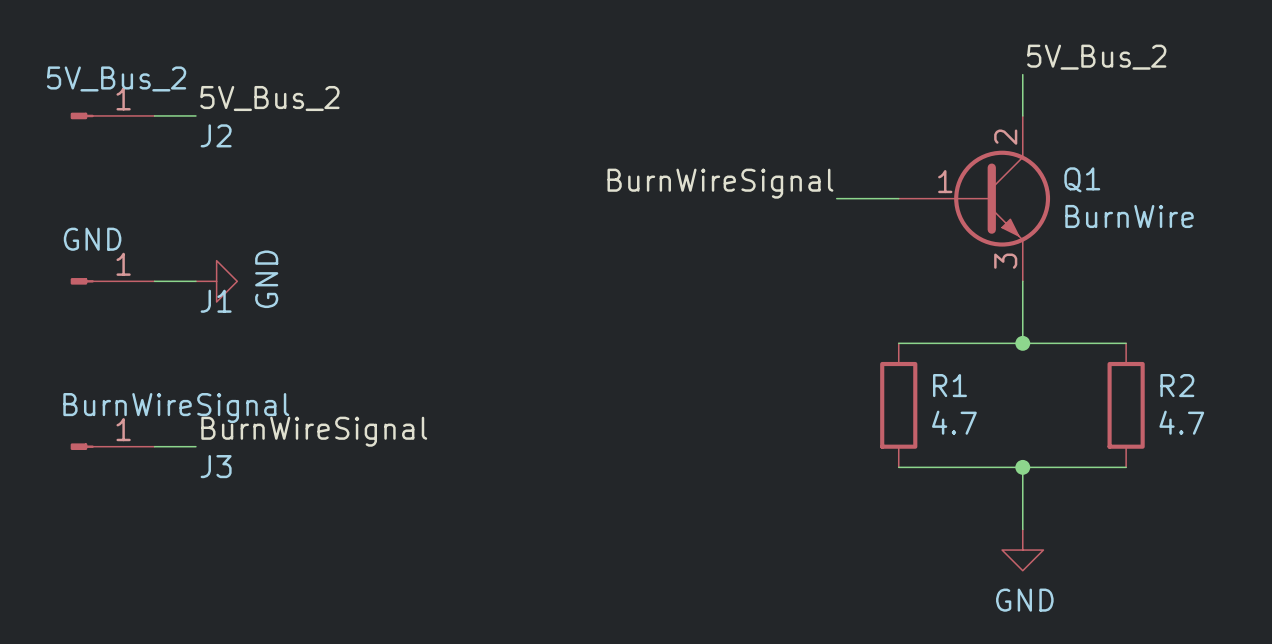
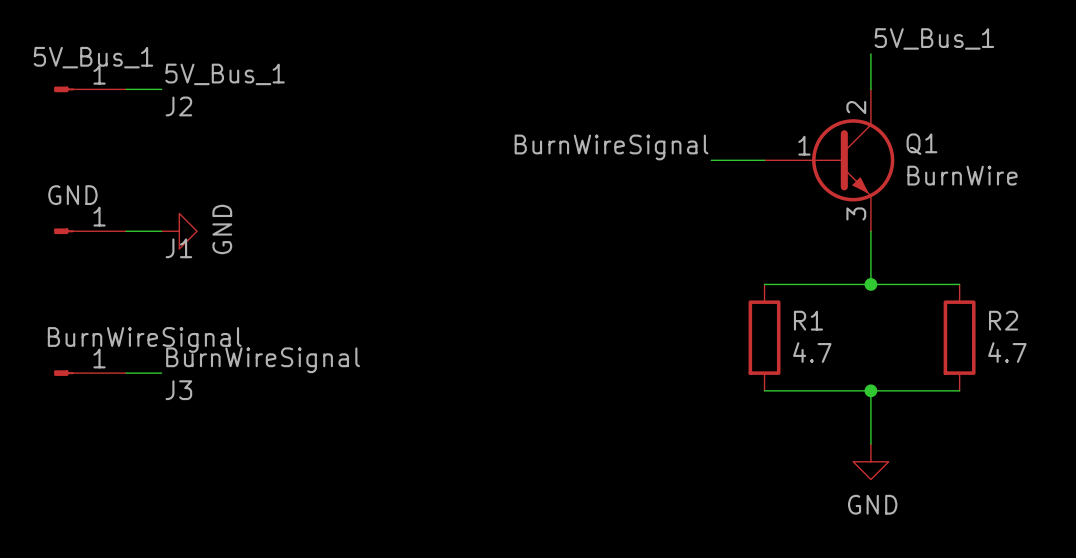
label: 5V_Bus_2 (1096, 57) -> 5V_Bus_1 (934, 38)
J2 value: 5V_Bus_2 (116, 78) -> 5V_Bus_1 (93, 57)
label: 5V_Bus_2 (269, 98) -> 5V_Bus_1 (225, 74)

